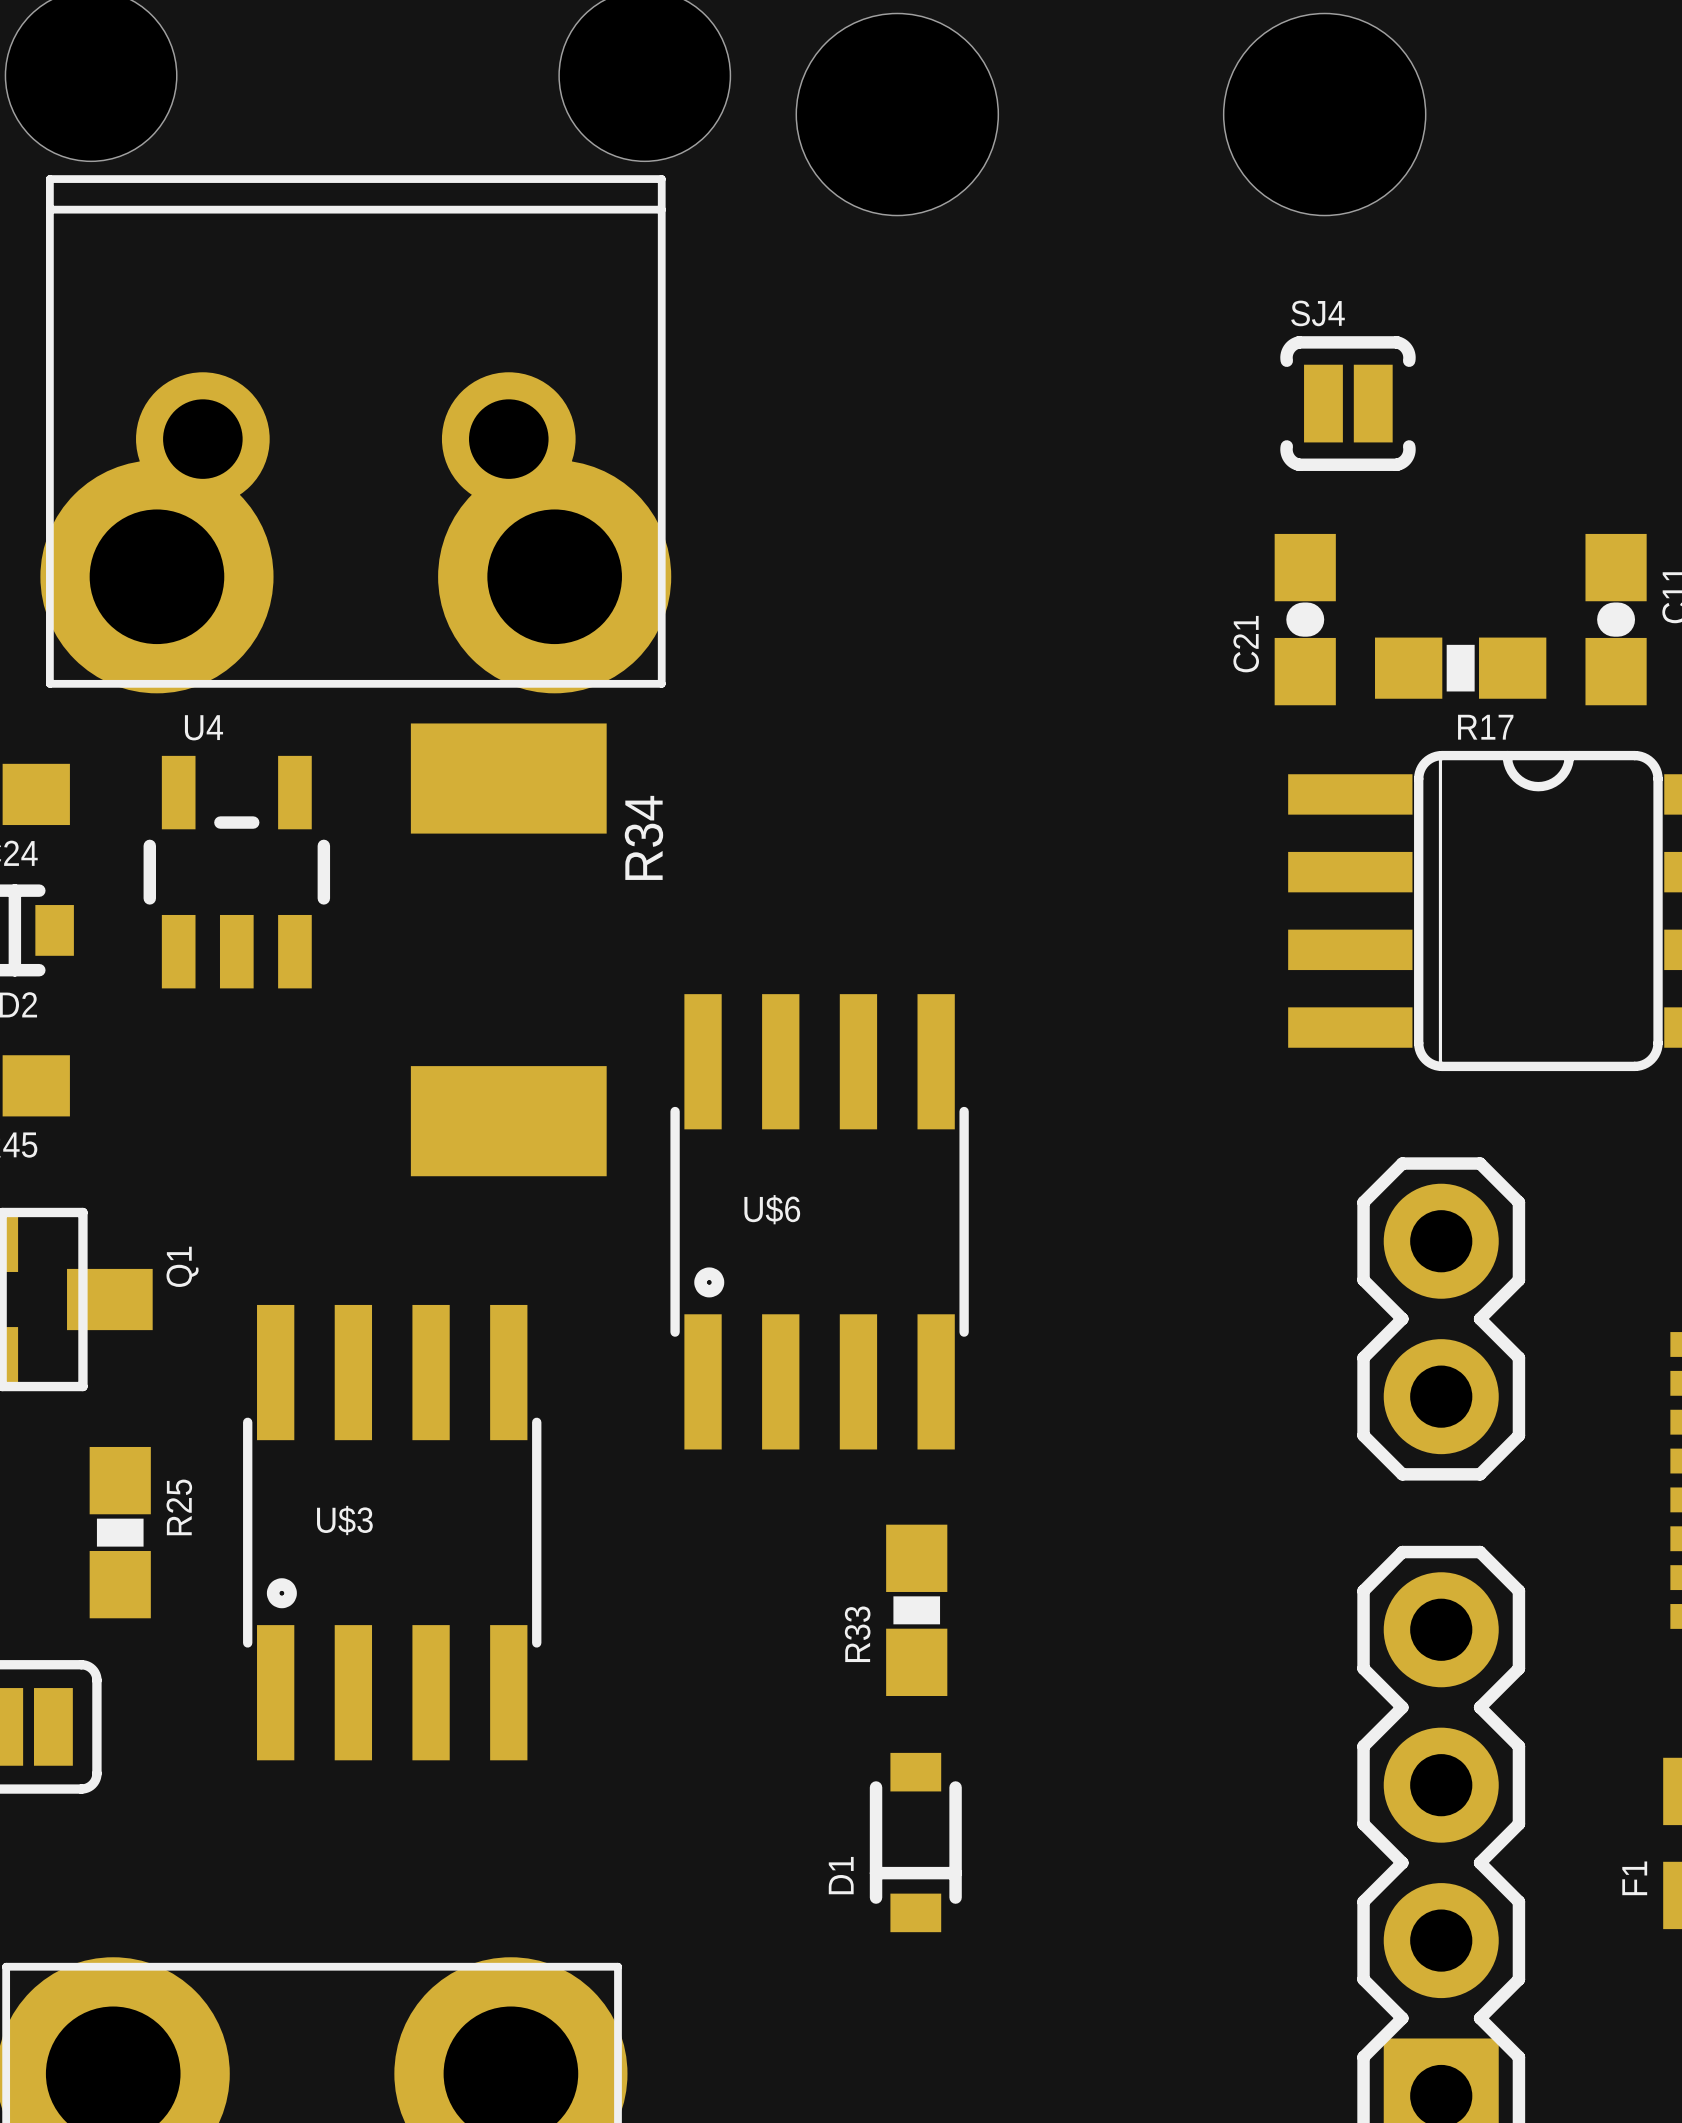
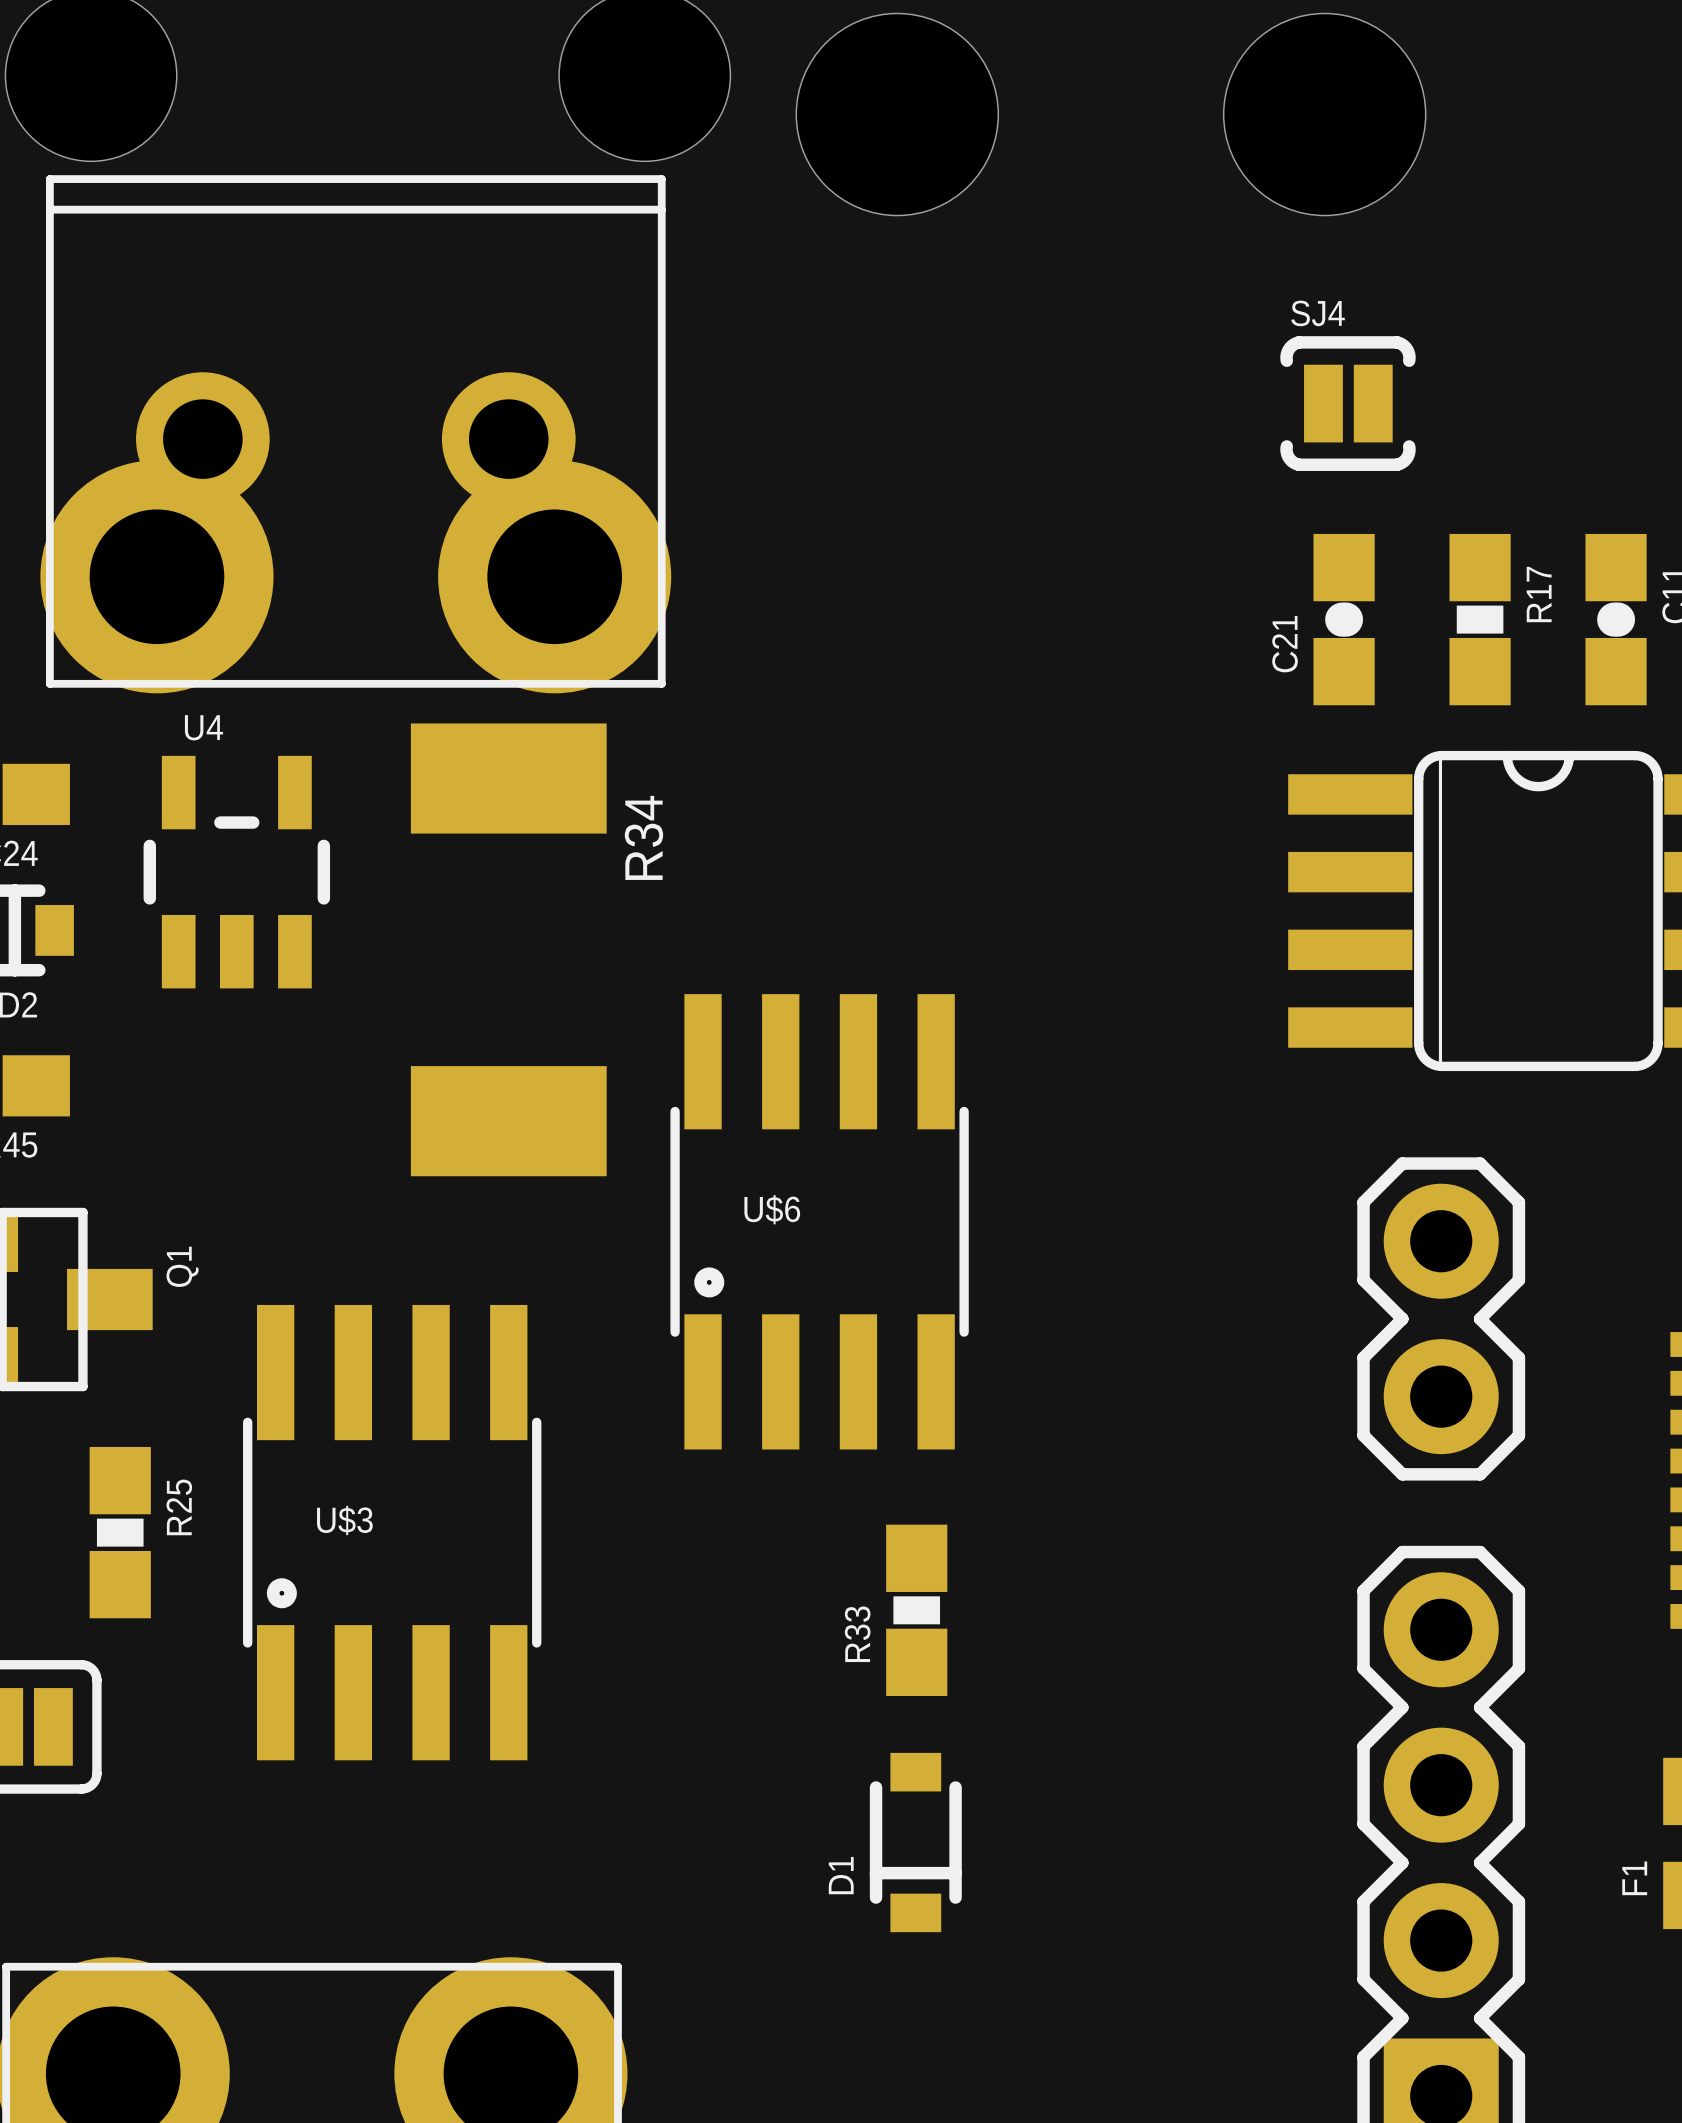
C21 position: (1305, 619) -> (1344, 619)
R17 rotation: 0° (1460, 668) -> 90° clockwise (1480, 619)

